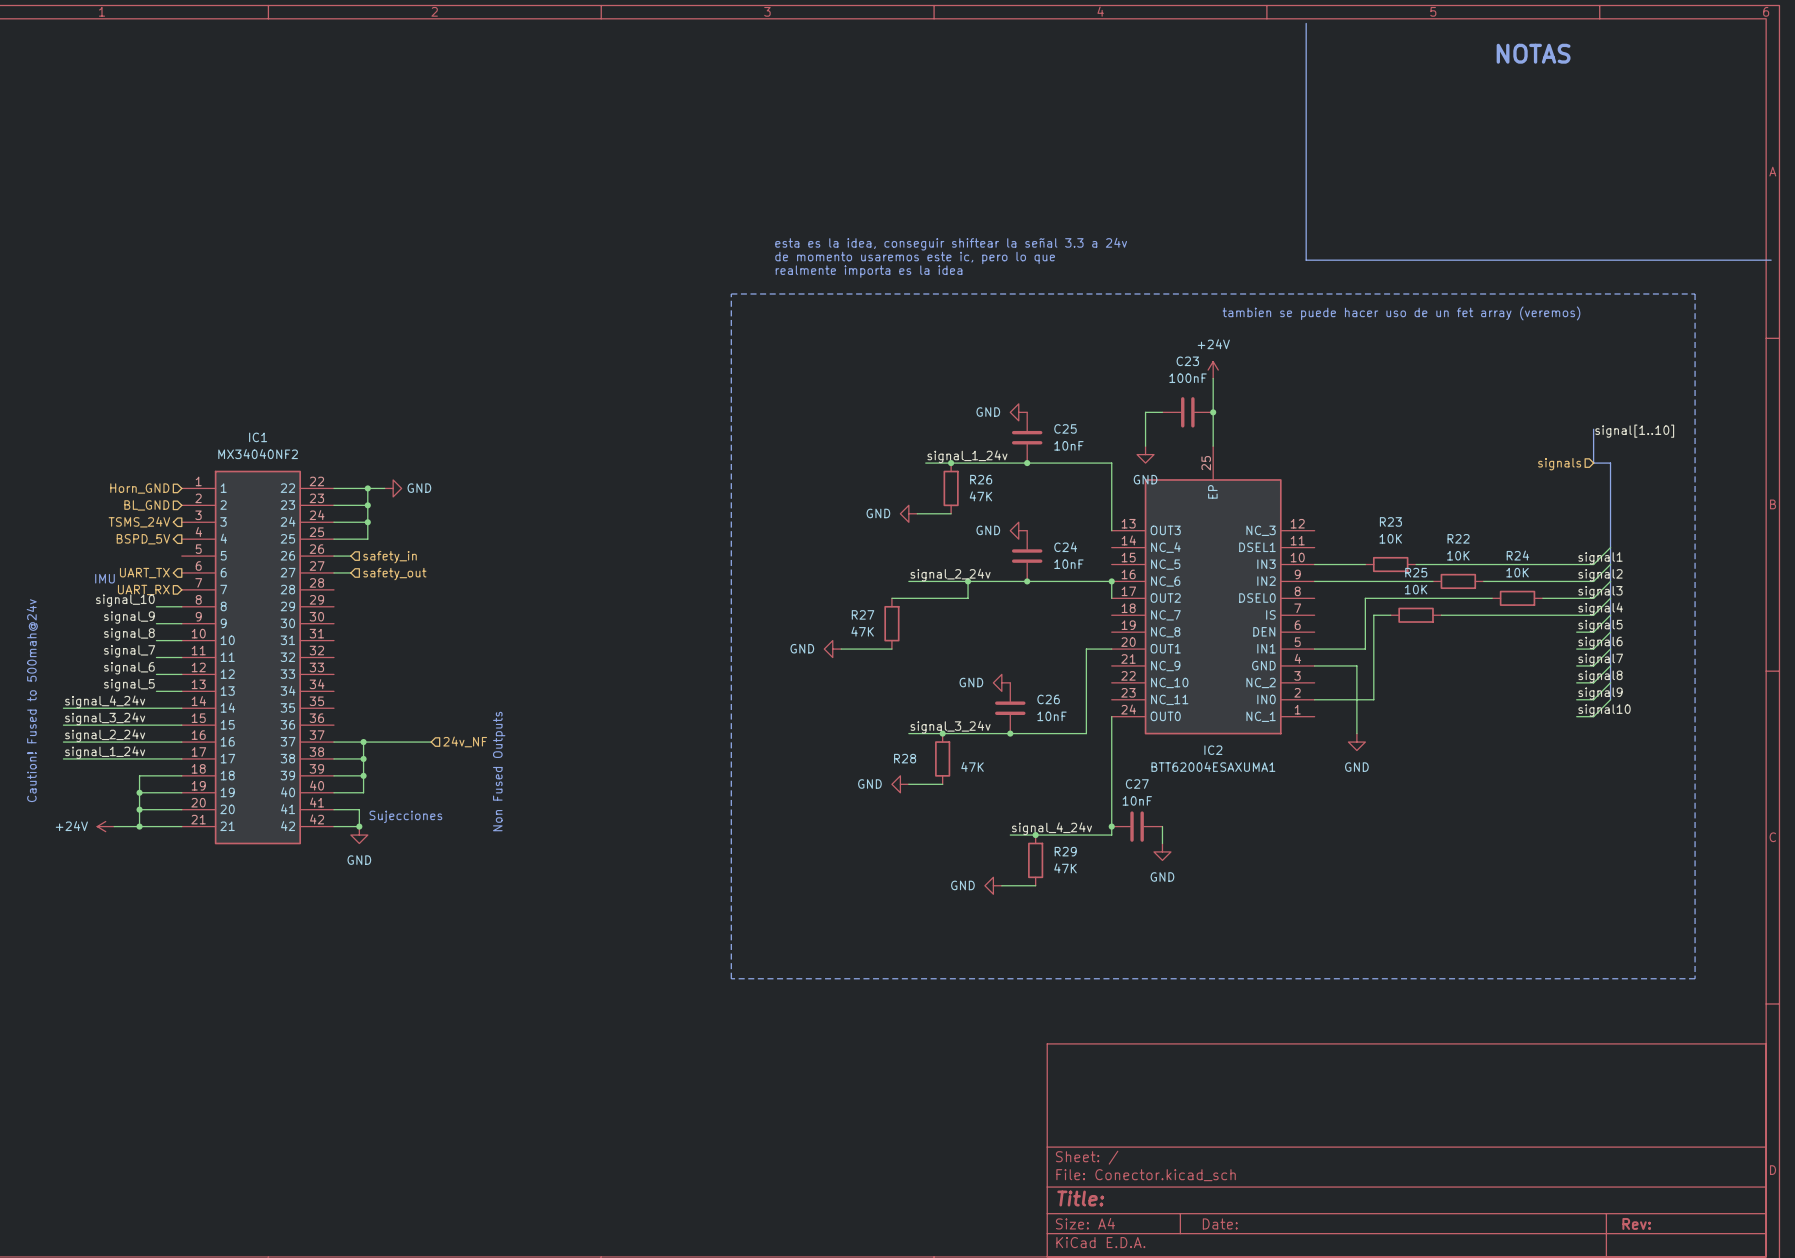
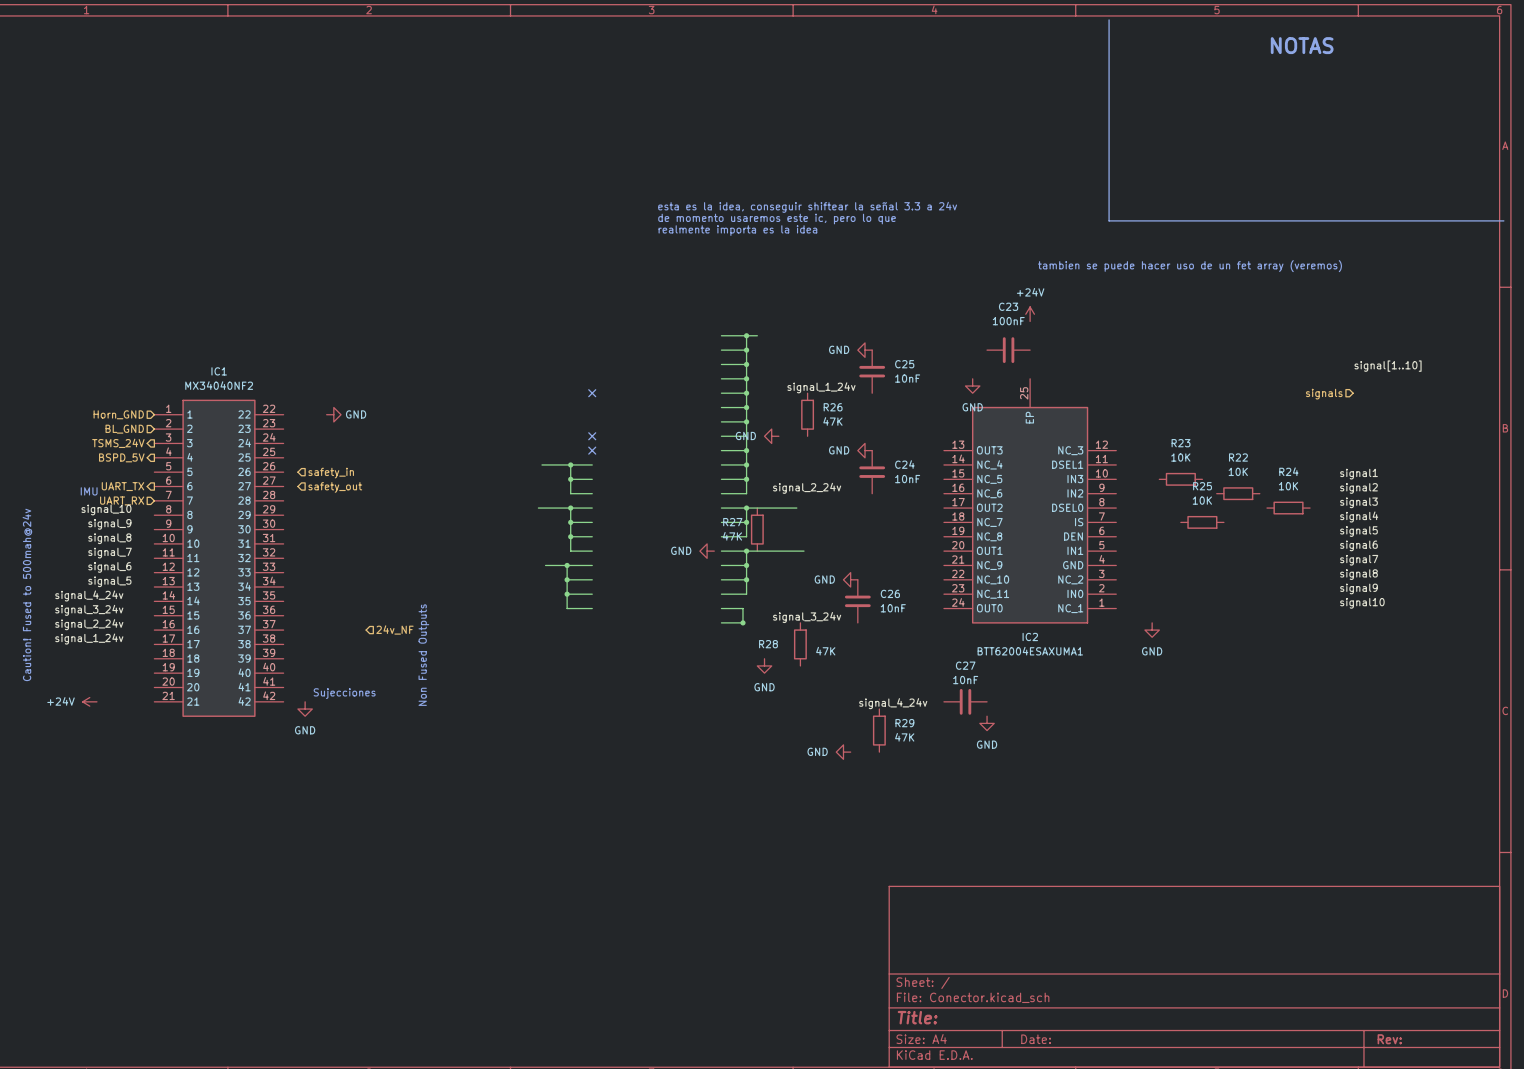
line: (731, 293) (1695, 293) (1695, 978) (731, 978) (731, 293) -> none
wire: (1213, 378) (1213, 446) -> none
wire: none -> (721, 335) (757, 335)
wire: none -> (746, 335) (746, 493) (721, 493)
junction: none -> (746, 335)
wire: none -> (721, 350) (746, 350)
junction: none -> (746, 350)
wire: (1162, 412) (1145, 412) (1145, 446) -> none
junction: (1213, 412) -> none
wire: none -> (721, 364) (746, 364)
junction: none -> (746, 364)
bus: (1593, 429) (1593, 463) (1610, 463) (1610, 699) -> none
wire: none -> (721, 378) (746, 378)
junction: none -> (746, 378)
no-connect mark: none -> (592, 393)
wire: none -> (721, 393) (746, 393)
junction: none -> (746, 393)
wire: (925, 463) (1111, 463) (1111, 530) -> none
junction: (951, 463) -> none
junction: (1027, 463) -> none
wire: none -> (721, 407) (746, 407)
junction: none -> (746, 407)
wire: (333, 488) (384, 488) -> none
wire: (367, 488) (367, 539) (333, 539) -> none
junction: (367, 488) -> none
wire: none -> (721, 421) (746, 421)
junction: none -> (746, 421)
wire: (333, 505) (367, 505) -> none
junction: (367, 505) -> none
no-connect mark: none -> (592, 436)
wire: none -> (721, 436) (746, 436)
wire: (917, 513) (951, 513) -> none
wire: (333, 522) (367, 522) -> none
junction: (367, 522) -> none
no-connect mark: none -> (592, 450)
wire: none -> (721, 450) (746, 450)
junction: none -> (746, 450)
wire: none -> (541, 464) (592, 464)
wire: none -> (570, 464) (570, 493) (592, 493)
junction: none -> (570, 464)
wire: none -> (721, 464) (746, 464)
junction: none -> (746, 464)
wire: (1610, 547) (1593, 564) (1416, 564) -> none
wire: (333, 556) (350, 556) -> none
wire: none -> (570, 479) (592, 479)
junction: none -> (570, 479)
wire: none -> (721, 479) (746, 479)
junction: none -> (746, 479)
wire: (1314, 564) (1365, 564) -> none
wire: (1610, 564) (1593, 581) (1483, 581) -> none
wire: (333, 572) (350, 572) -> none
wire: (908, 581) (1111, 581) (1111, 598) -> none
wire: (968, 581) (968, 598) (938, 598) -> none
junction: (968, 581) -> none
junction: (1027, 581) -> none
junction: (1111, 581) -> none
wire: (1314, 581) (1432, 581) -> none
wire: (1610, 581) (1593, 598) (1542, 598) -> none
wire: none -> (538, 508) (592, 508)
wire: none -> (570, 508) (570, 551) (592, 551)
junction: none -> (570, 508)
wire: none -> (721, 508) (757, 508)
wire: none -> (746, 508) (746, 536) (721, 536)
junction: none -> (746, 508)
wire: (1492, 598) (1365, 598) (1365, 649) (1314, 649) -> none
wire: (1610, 598) (1593, 615) (1441, 615) -> none
wire: (156, 606) (181, 606) -> none
wire: none -> (570, 522) (592, 522)
junction: none -> (570, 522)
wire: none -> (721, 522) (746, 522)
junction: none -> (746, 522)
wire: (1390, 615) (1373, 615) (1373, 699) (1314, 699) -> none
wire: (1610, 615) (1593, 632) (1576, 632) -> none
wire: (156, 623) (181, 623) -> none
wire: none -> (570, 536) (592, 536)
junction: none -> (570, 536)
wire: (1610, 632) (1593, 649) (1576, 649) -> none
wire: (156, 640) (181, 640) -> none
wire: (841, 649) (849, 649) -> none
wire: none -> (746, 551) (746, 594) (721, 594)
junction: none -> (746, 551)
wire: none -> (757, 551) (803, 551)
wire: (1111, 649) (1086, 649) (1086, 733) (908, 733) -> none
wire: (1610, 649) (1593, 665) (1576, 665) -> none
wire: (156, 657) (181, 657) -> none
wire: none -> (545, 565) (592, 565)
wire: none -> (567, 565) (567, 608) (592, 608)
junction: none -> (567, 565)
wire: none -> (721, 565) (746, 565)
junction: none -> (746, 565)
wire: (1314, 665) (1356, 665) (1356, 733) -> none
wire: (1610, 665) (1593, 682) (1576, 682) -> none
wire: (156, 674) (181, 674) -> none
wire: none -> (567, 579) (592, 579)
junction: none -> (567, 579)
wire: none -> (721, 579) (746, 579)
junction: none -> (746, 579)
wire: (1610, 682) (1593, 699) (1576, 699) -> none
wire: (156, 691) (181, 691) -> none
wire: none -> (567, 594) (592, 594)
junction: none -> (567, 594)
wire: (1610, 699) (1593, 716) (1576, 716) -> none
wire: (63, 708) (181, 708) -> none
wire: none -> (721, 608) (742, 608) (742, 622) (721, 622)
wire: (1111, 716) (1111, 835) (1010, 835) -> none
wire: (63, 725) (181, 725) -> none
junction: none -> (742, 622)
junction: (942, 733) -> none
junction: (1010, 733) -> none
wire: (63, 742) (181, 742) -> none
wire: (333, 742) (431, 742) -> none
wire: (363, 742) (363, 792) (333, 792) -> none
junction: (363, 742) -> none
wire: (63, 758) (181, 758) -> none
wire: (333, 758) (363, 758) -> none
junction: (363, 758) -> none
wire: (181, 775) (139, 775) (139, 826) -> none
wire: (333, 775) (363, 775) -> none
junction: (363, 775) -> none
power symbol rotation: 0° (900, 784) -> 90° counterclockwise (764, 665)
wire: (908, 784) (942, 784) -> none
wire: (139, 792) (181, 792) -> none
junction: (139, 792) -> none
wire: (139, 809) (181, 809) -> none
junction: (139, 809) -> none
wire: (333, 809) (359, 809) (359, 826) (333, 826) -> none
wire: (114, 826) (181, 826) -> none
junction: (139, 826) -> none
junction: (359, 826) -> none
junction: (1111, 826) -> none
wire: (1162, 826) (1162, 843) -> none
junction: (1035, 835) -> none
wire: (1001, 885) (1035, 885) -> none

